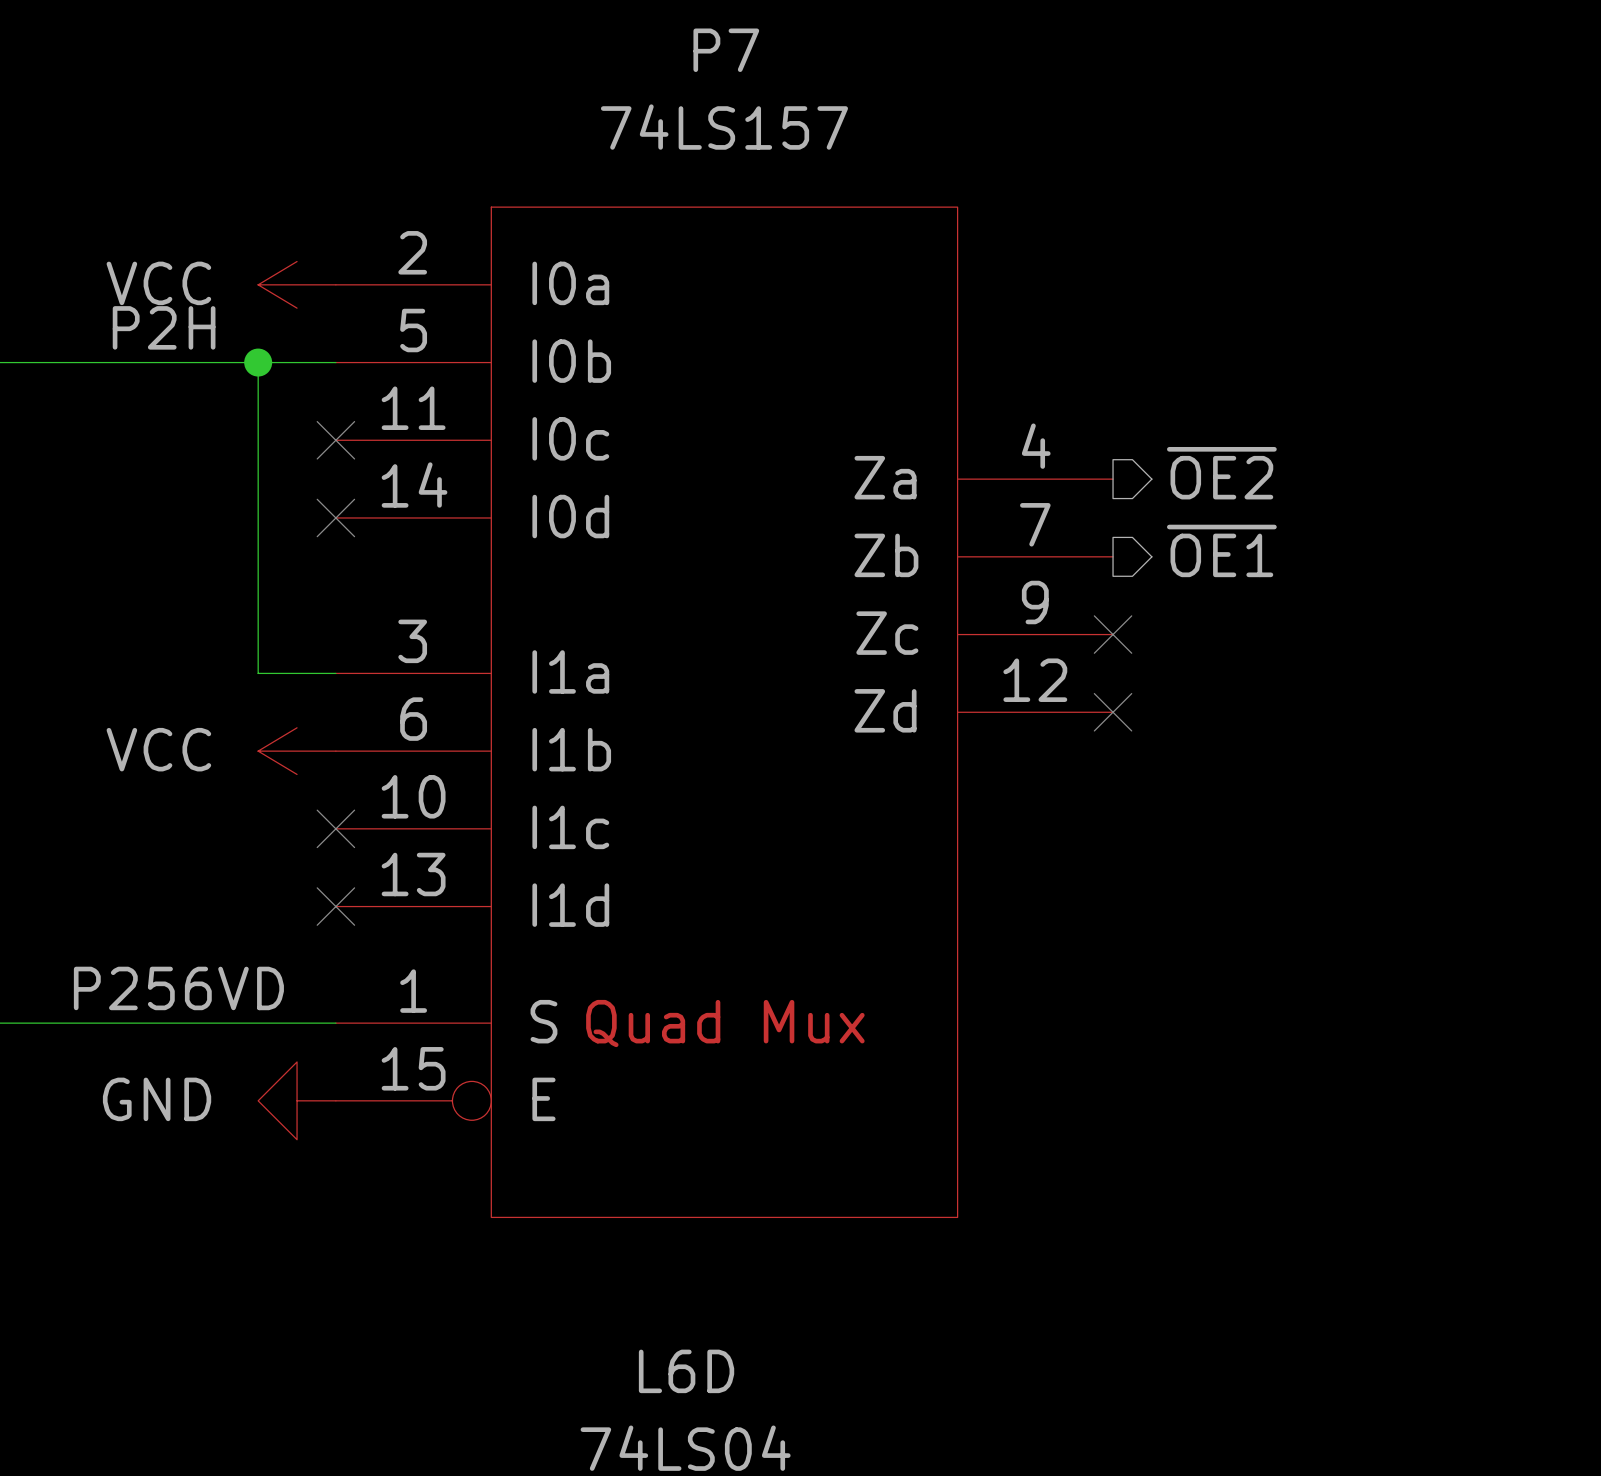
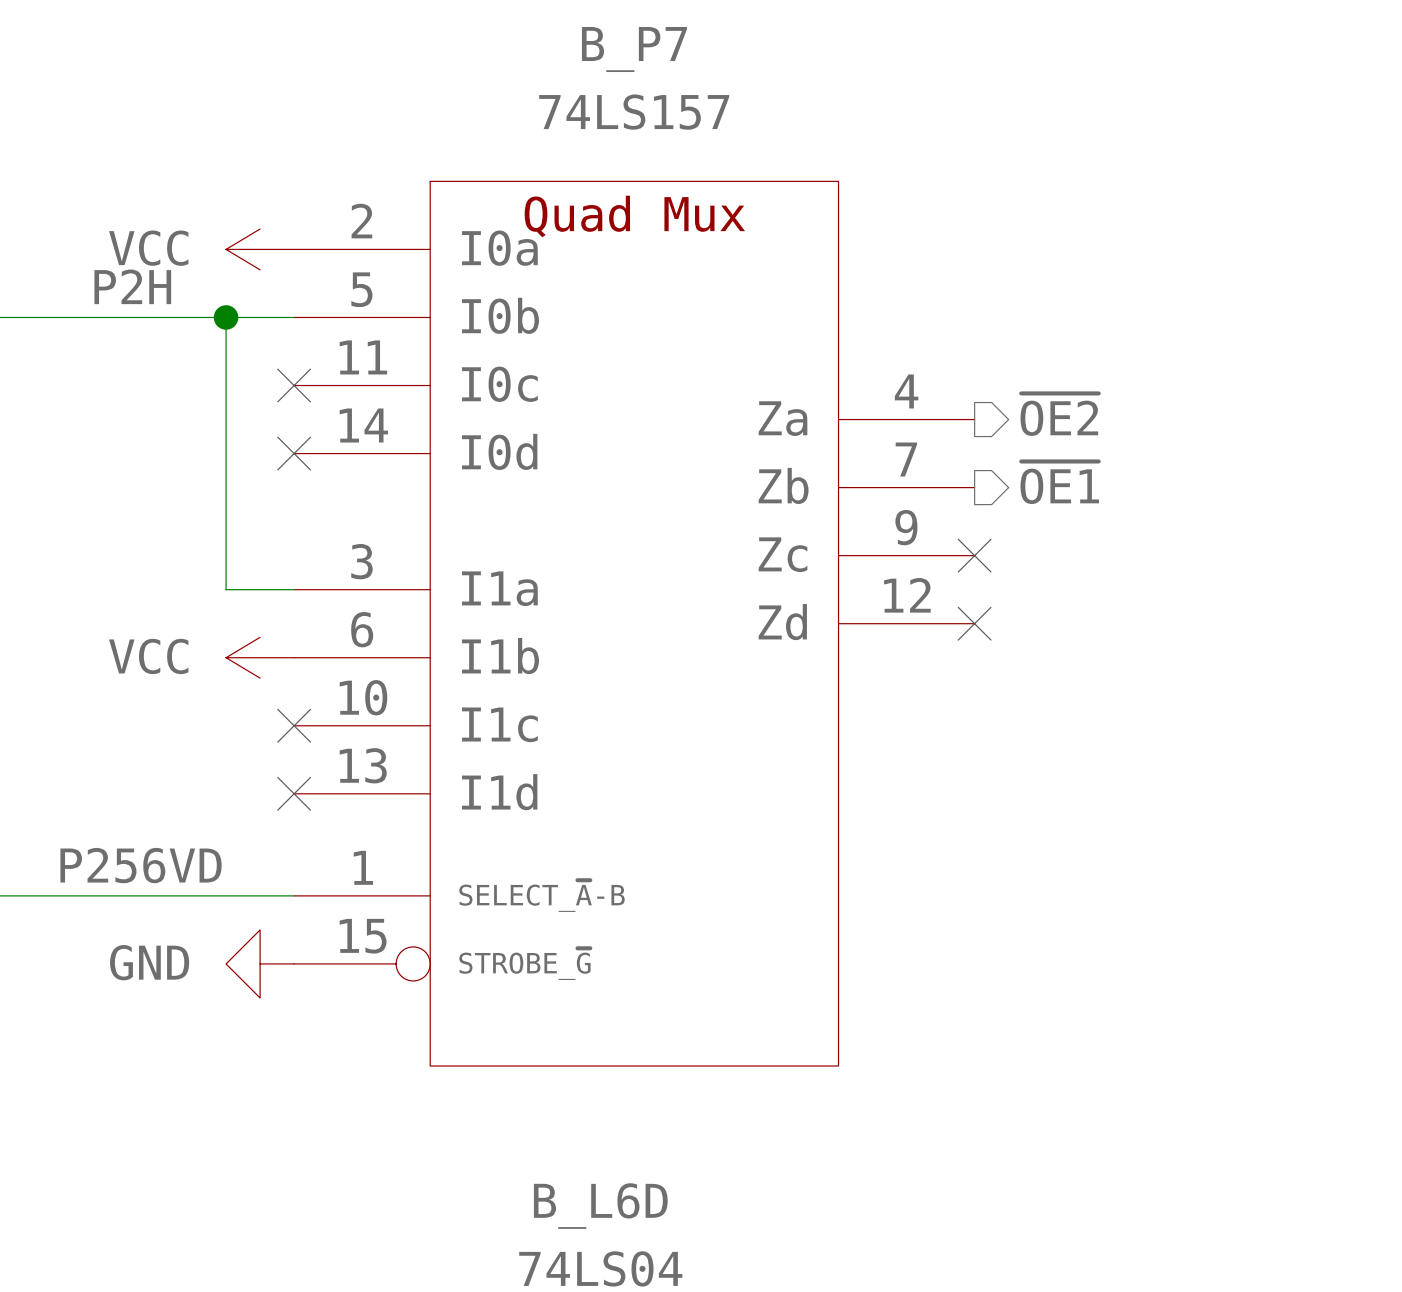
P7 name: P7 (726, 50) -> B_P7 (634, 49)
P7 pin name: S (543, 1021) -> SELECT_~{A}-B (542, 896)
P7 text position: Quad Mux (725, 1023) -> Quad Mux (634, 216)
P7 pin name: E (543, 1099) -> STROBE_~{G} (524, 964)
L6D name: L6D (686, 1371) -> B_L6D (600, 1206)

